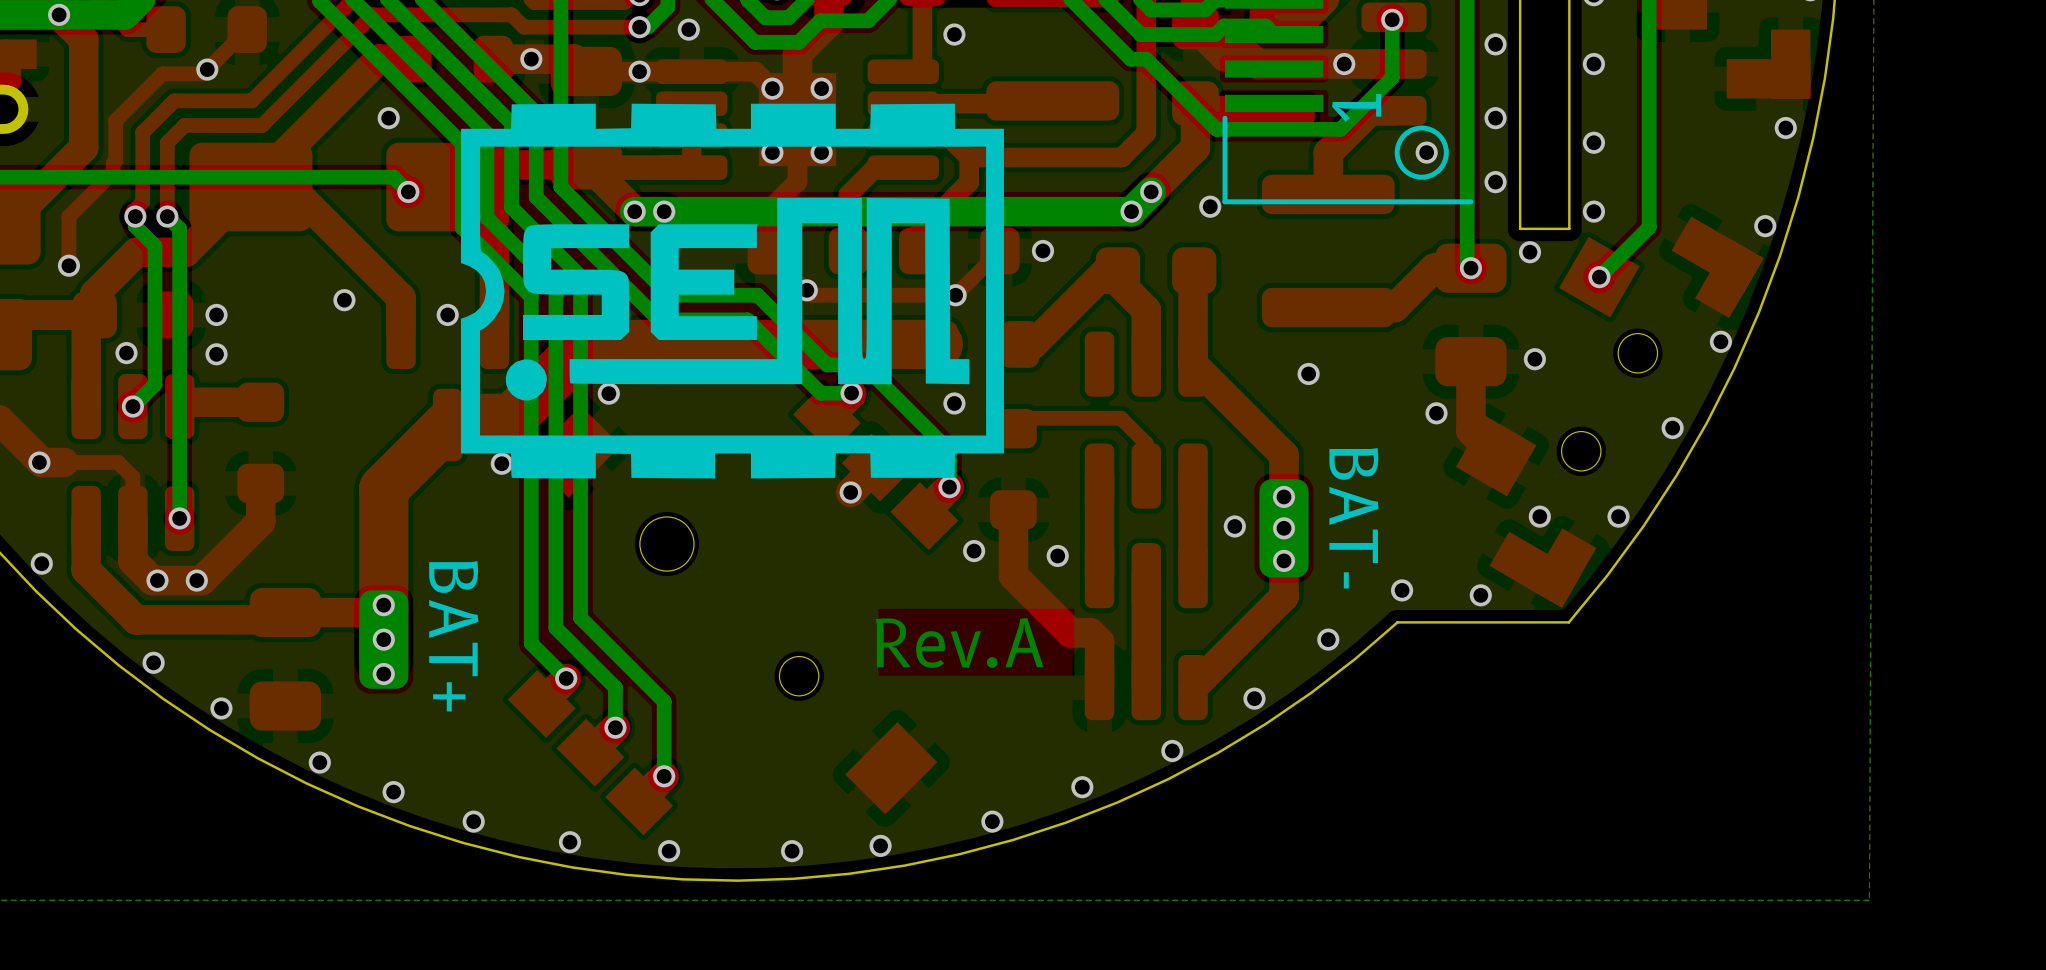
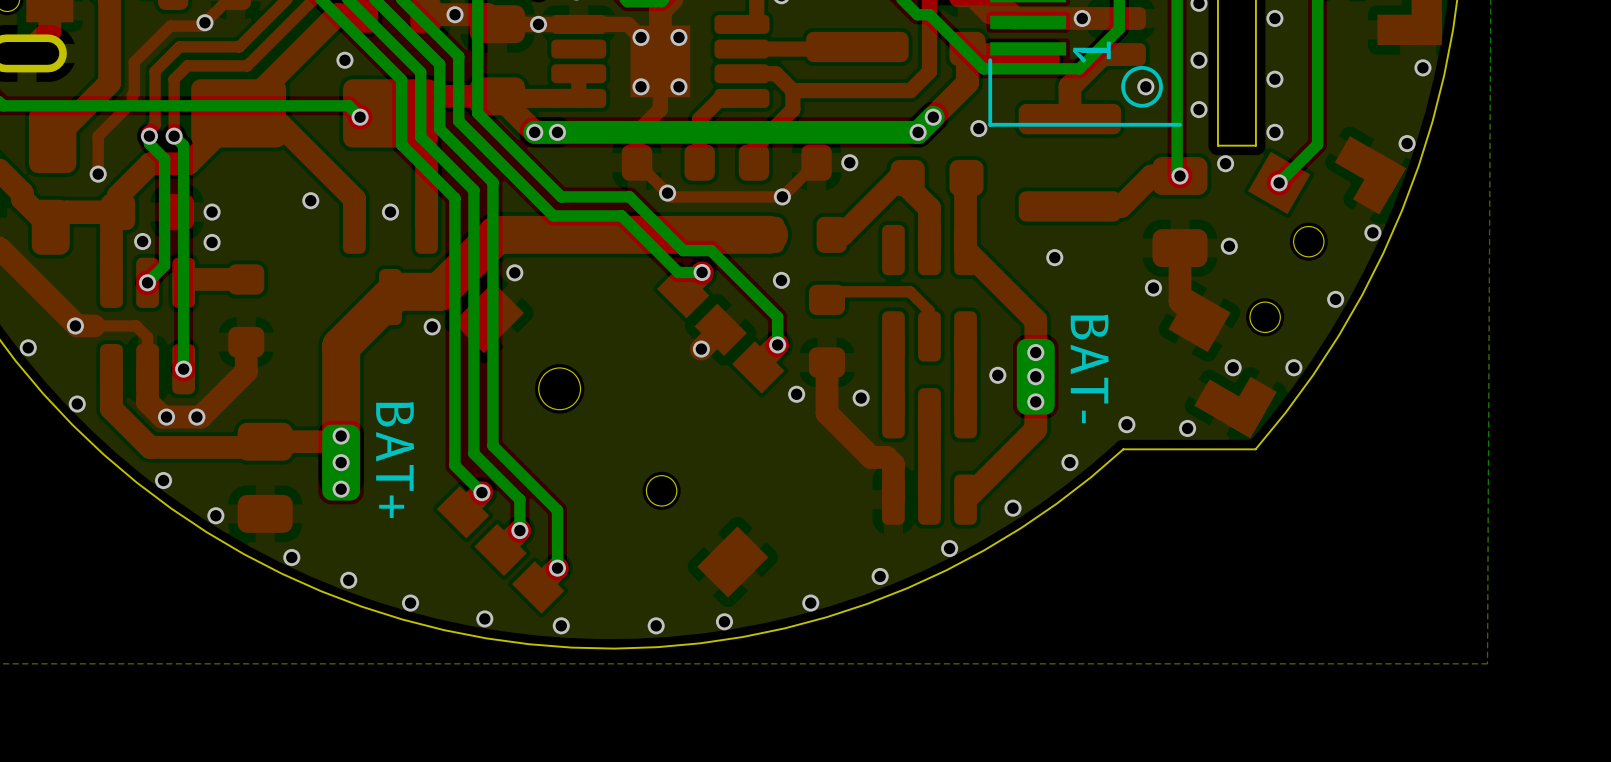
drawing: [460, 103, 1004, 479] -> none
text: Rev.A (959, 643) -> none

